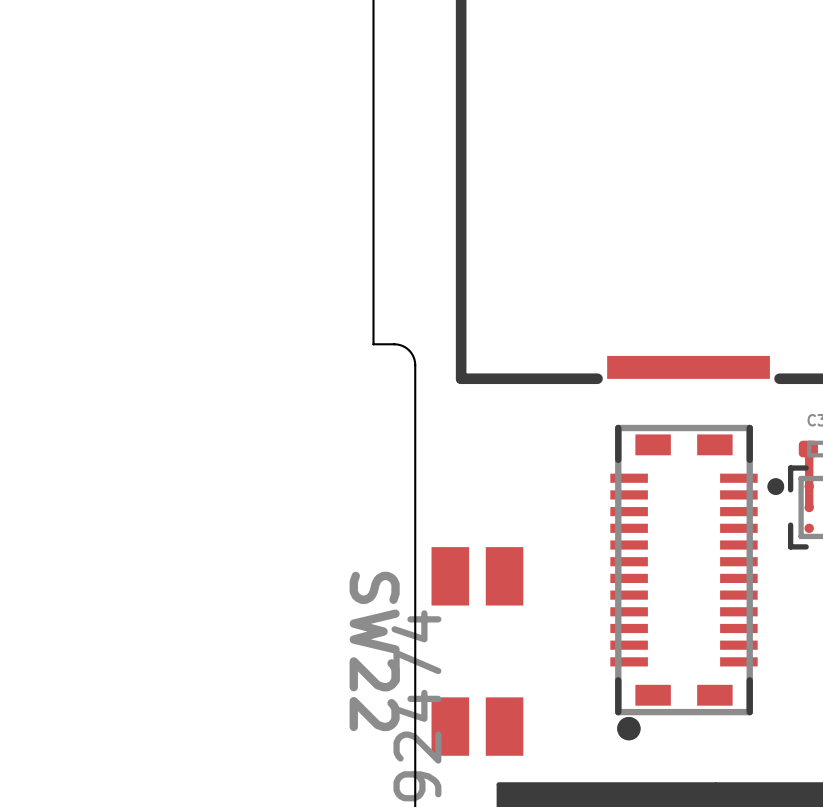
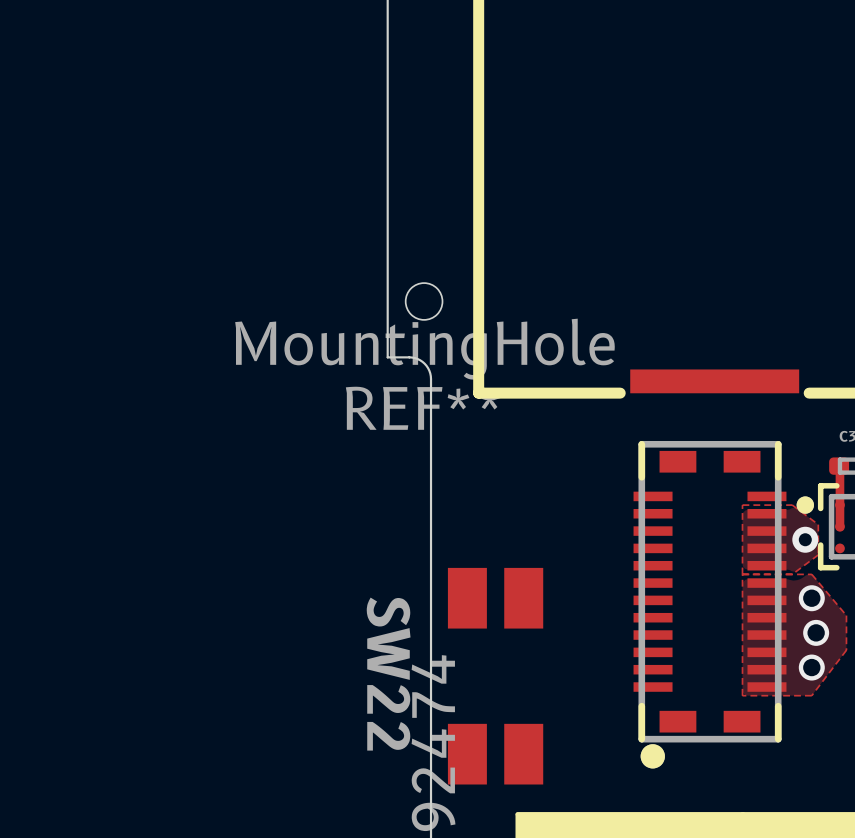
REF**: none -> MountingHole (424, 301)
via: none -> (805, 539)
top zone outline: none -> (742, 574) (811, 574) (846, 615) (846, 650) (811, 695) (742, 695) (742, 505) (792, 505) (818, 524) (818, 554) (792, 574)
via: none -> (811, 598)
via: none -> (816, 632)
via: none -> (811, 667)

